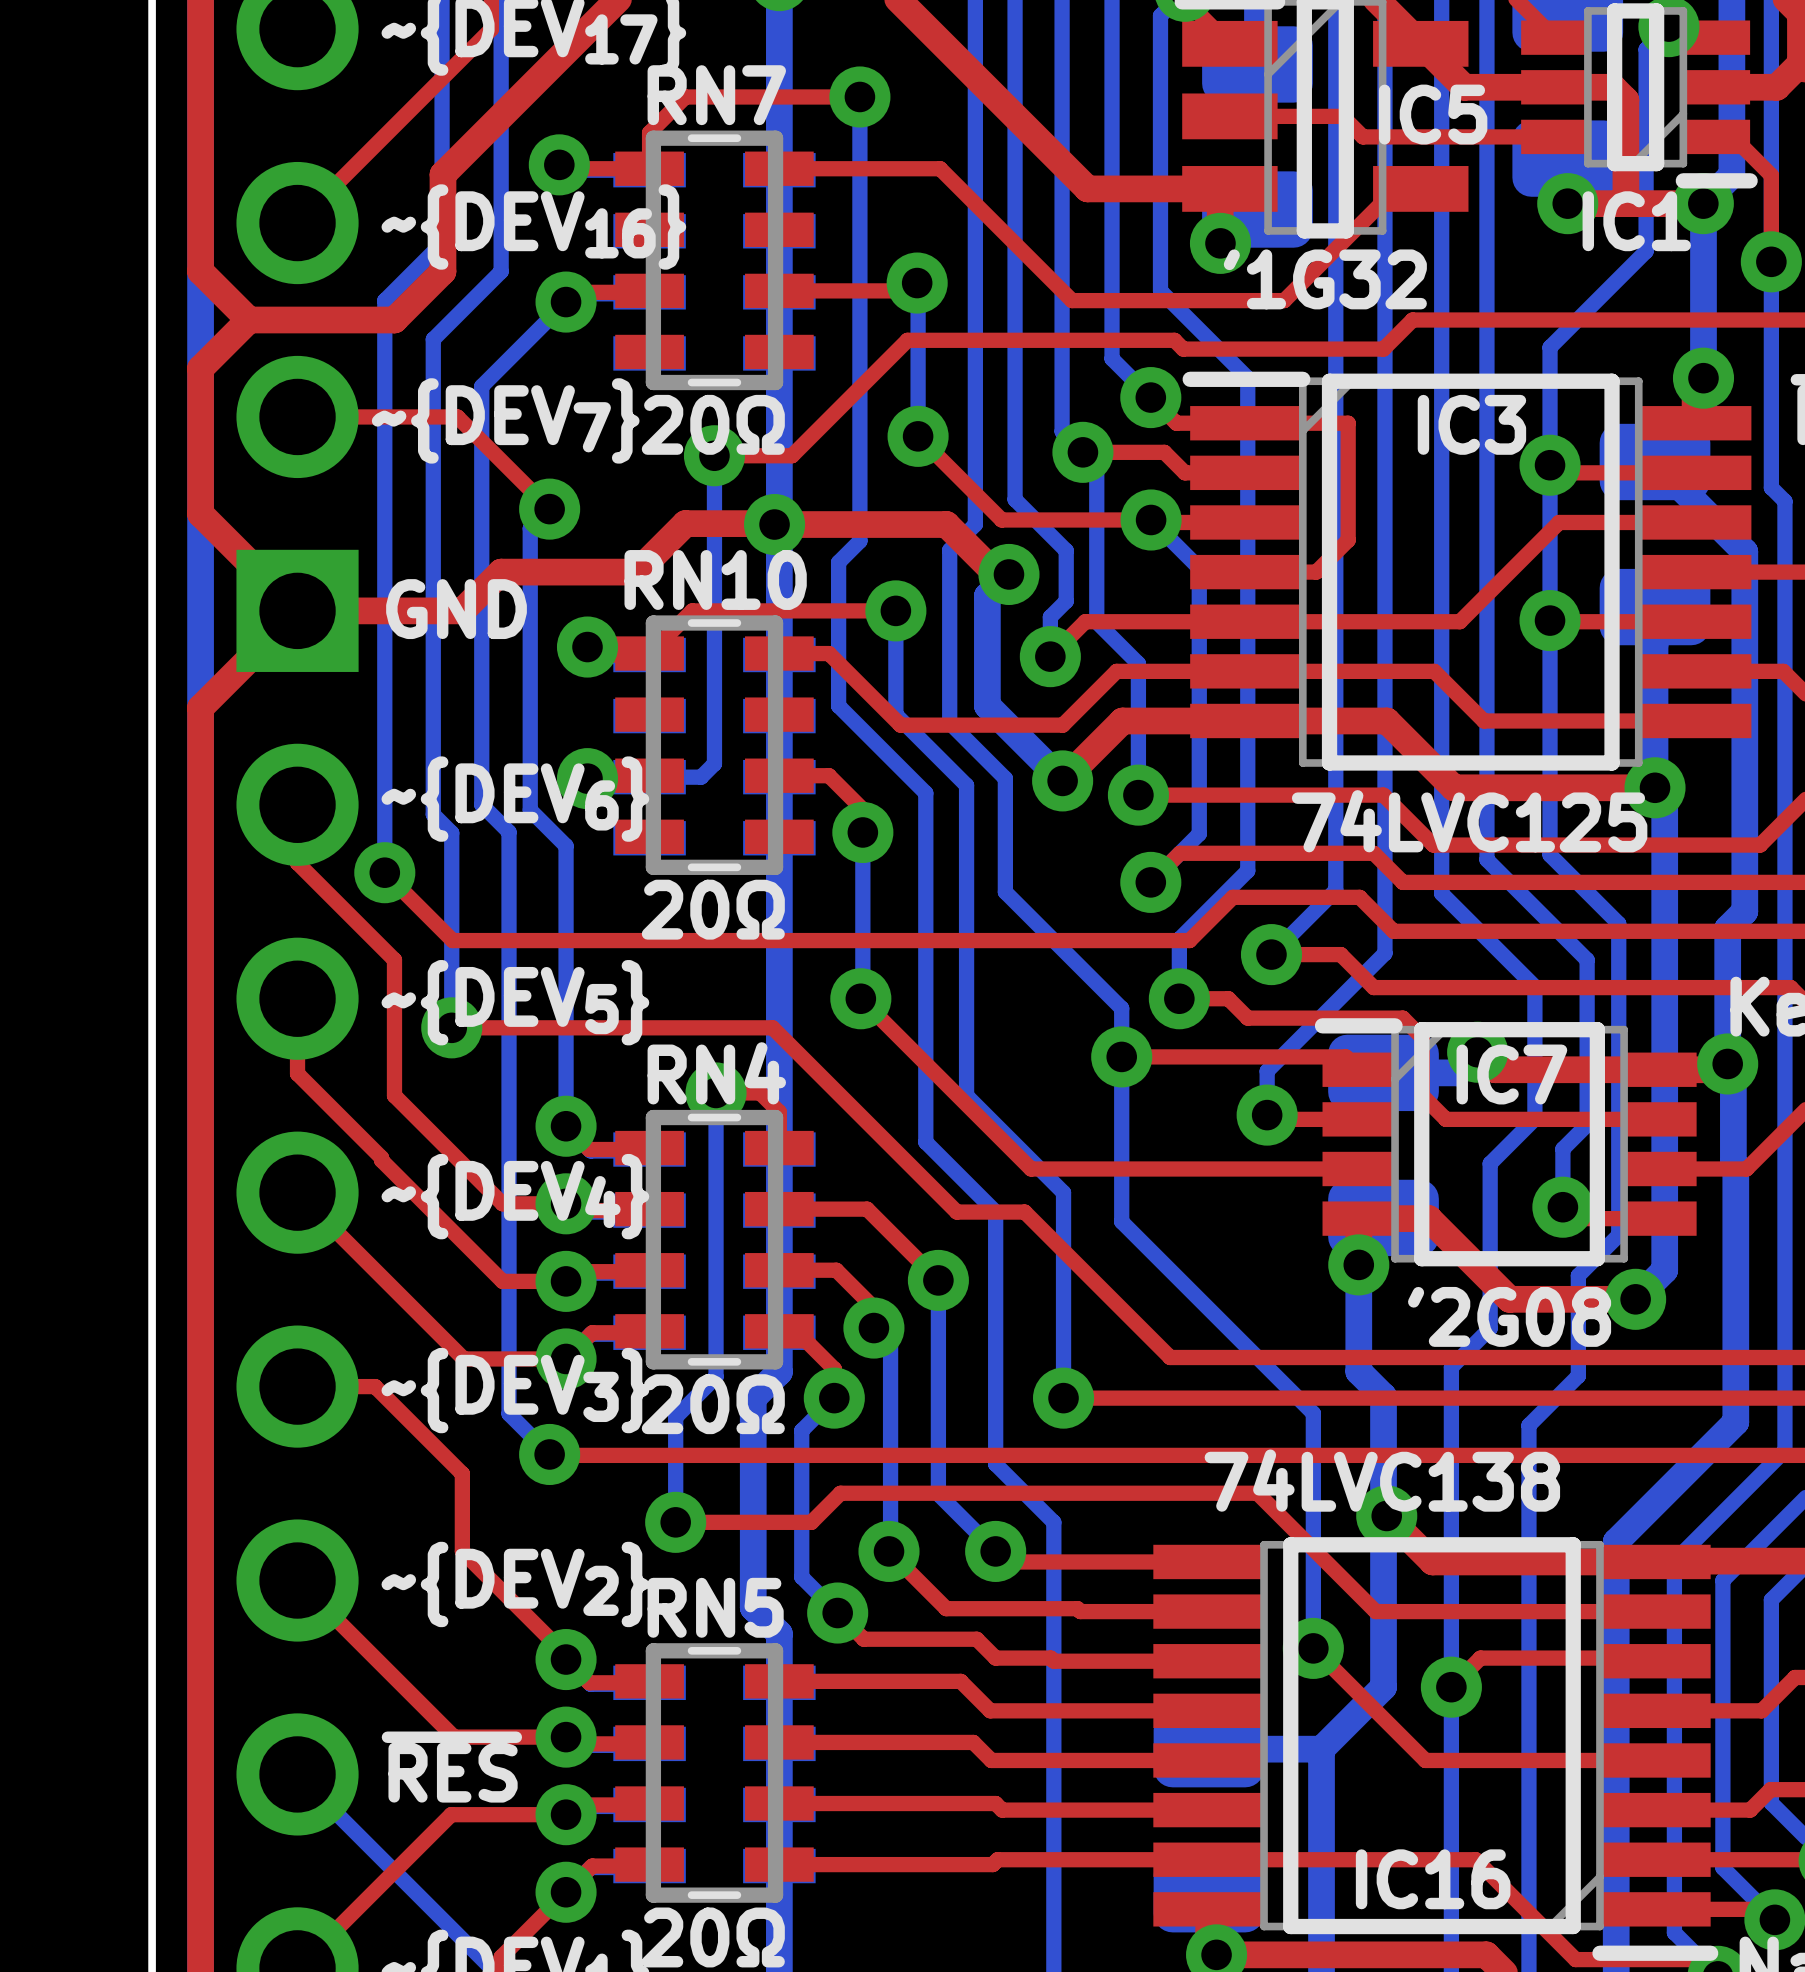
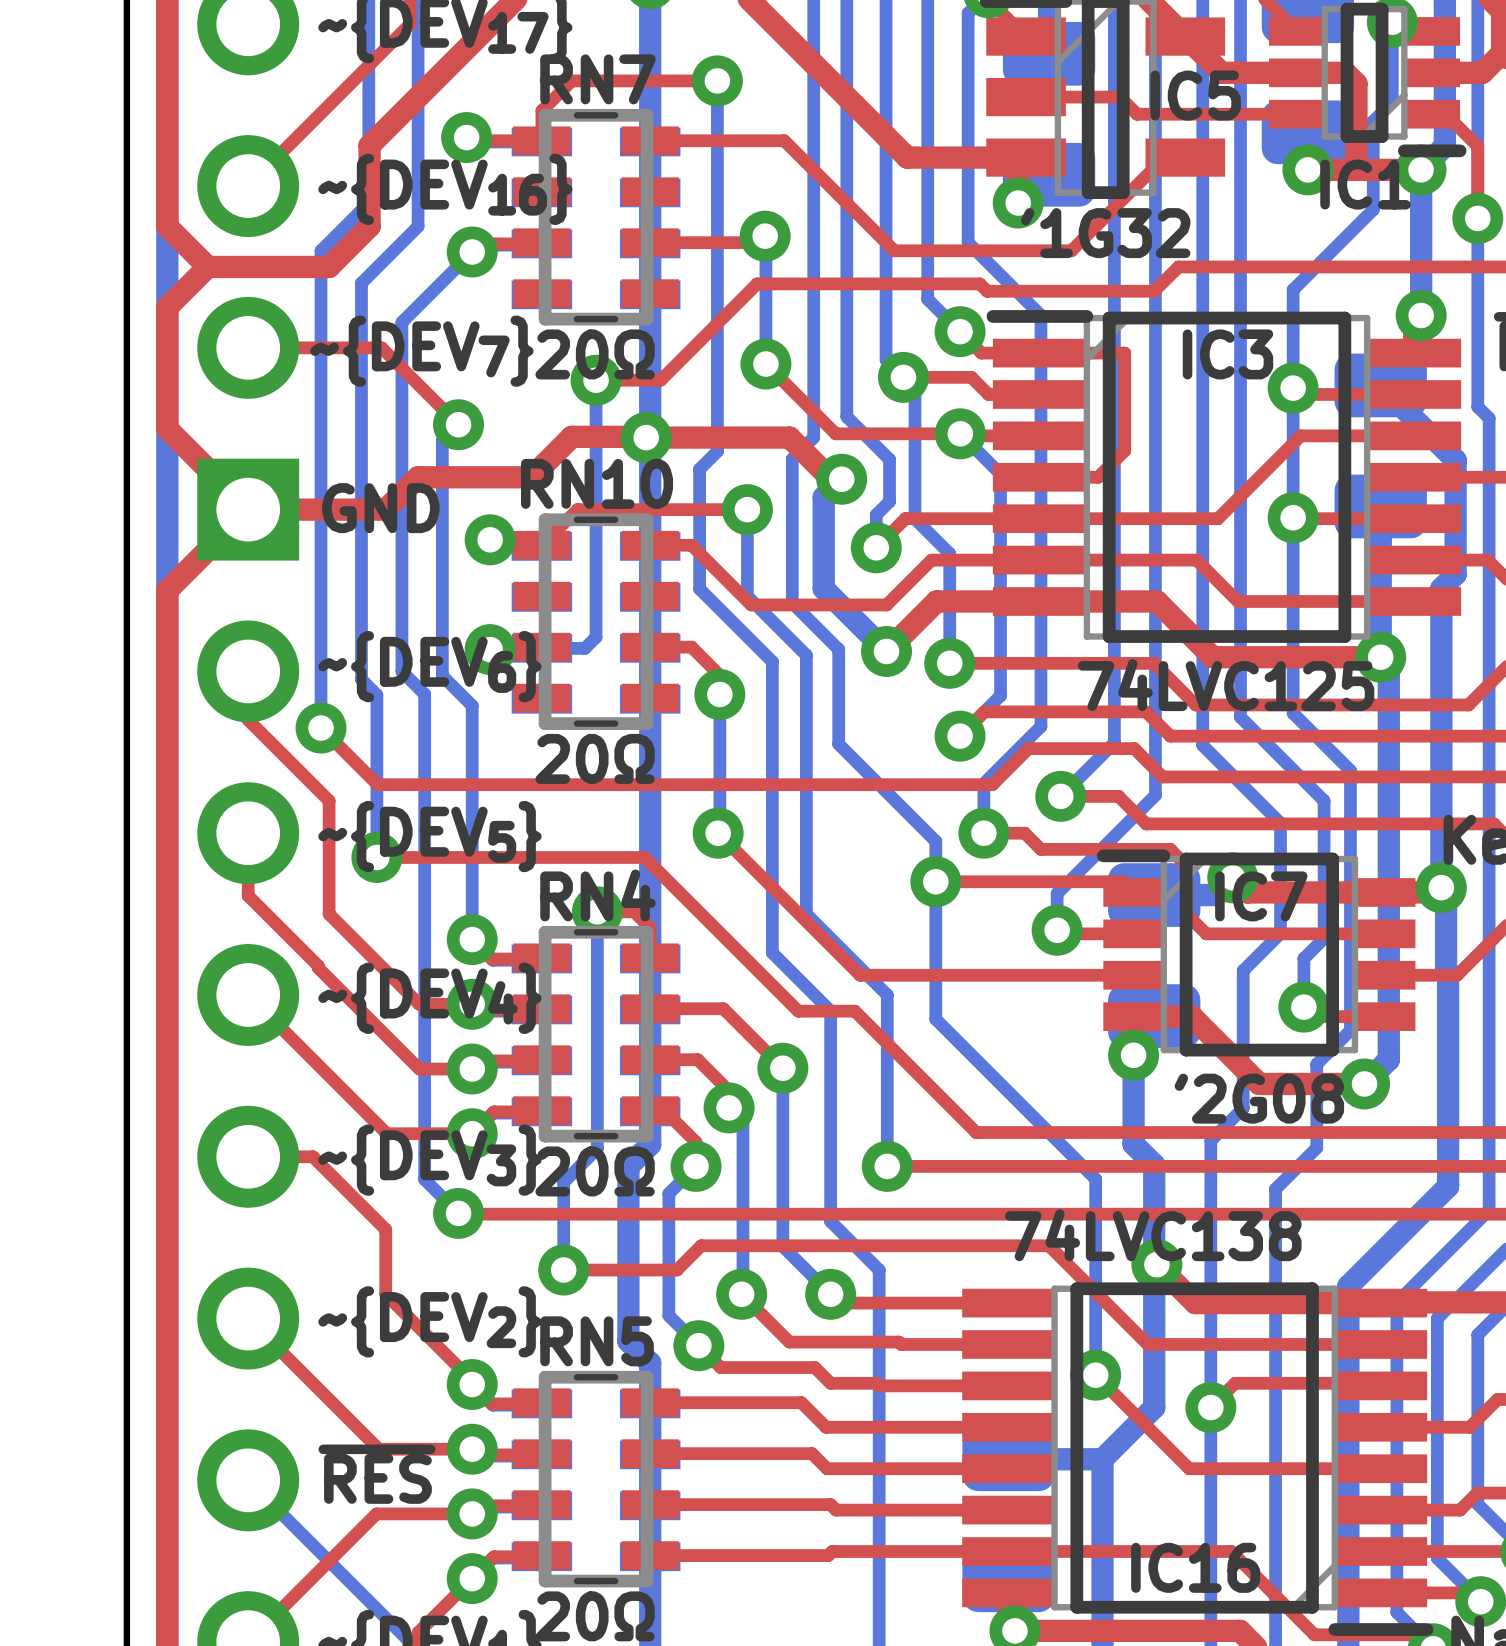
bottom track: (1668, 26) (1646, 49) (1646, 145) -> (1392, 22) (1392, 102) (1373, 121)
bottom track: (1744, 688) (1744, 911) (1727, 928) -> (1455, 574) (1441, 588) (1441, 774)

